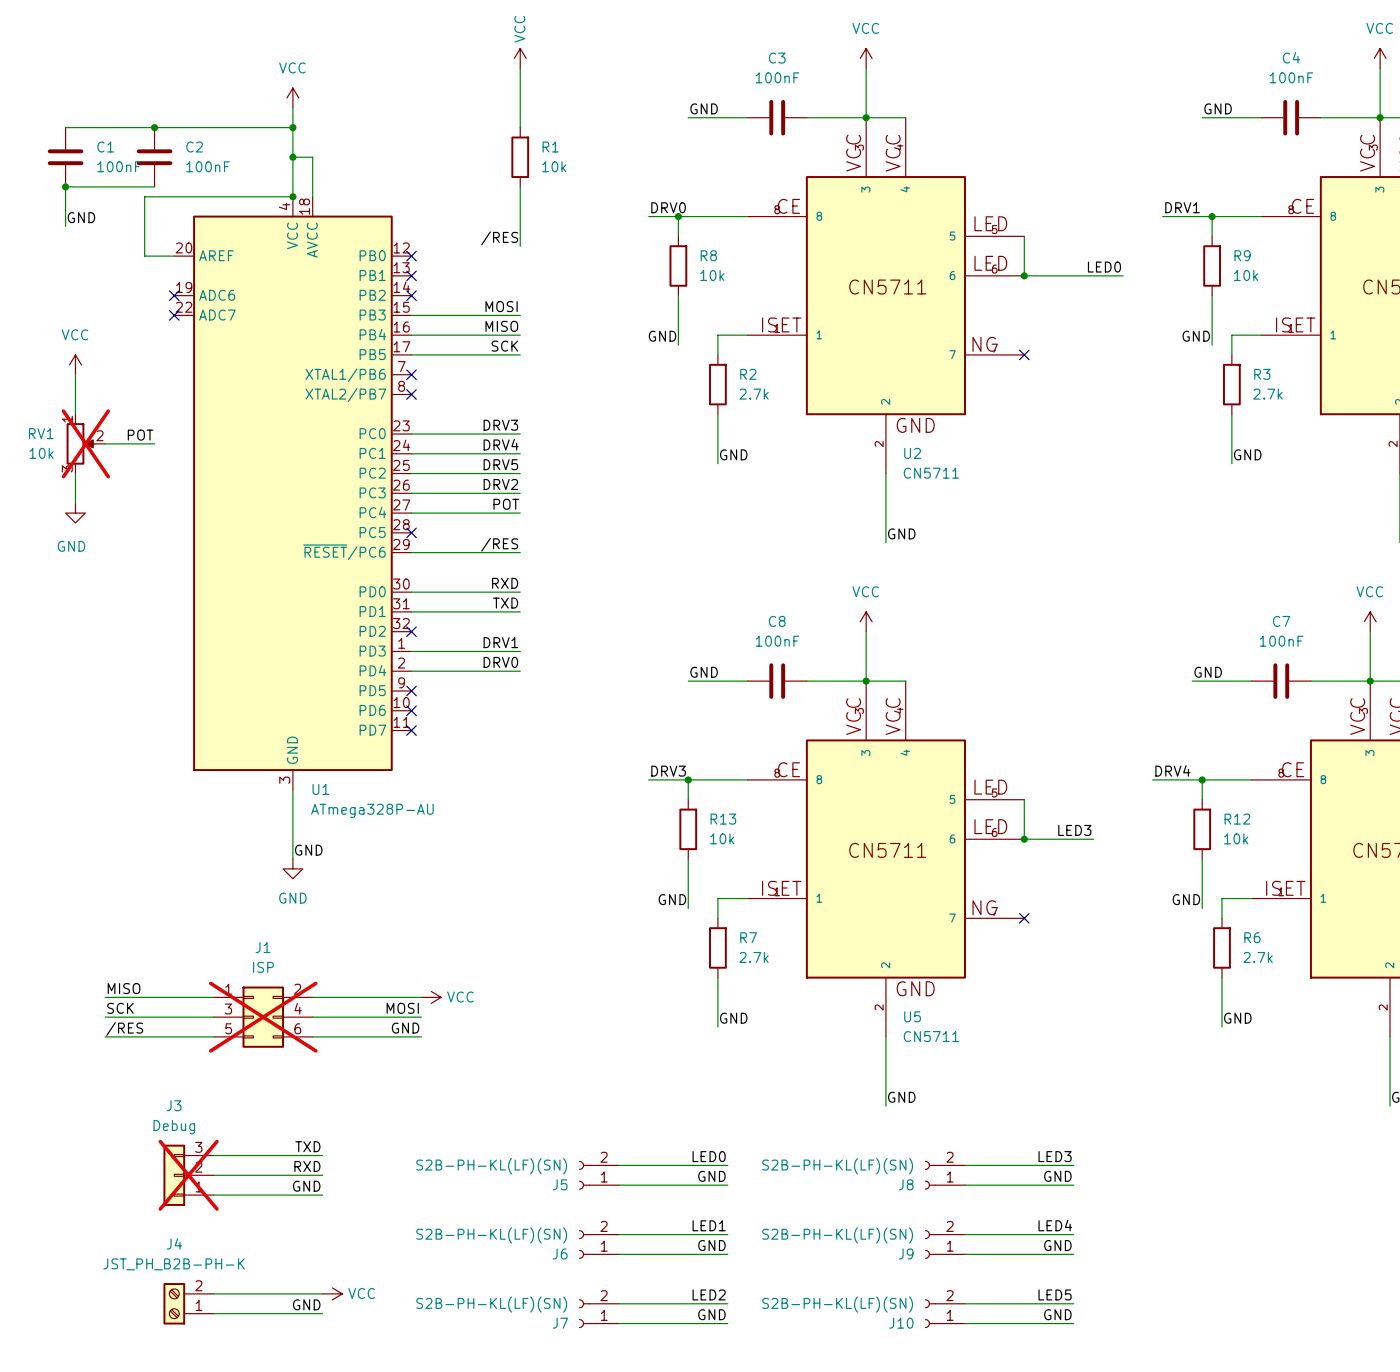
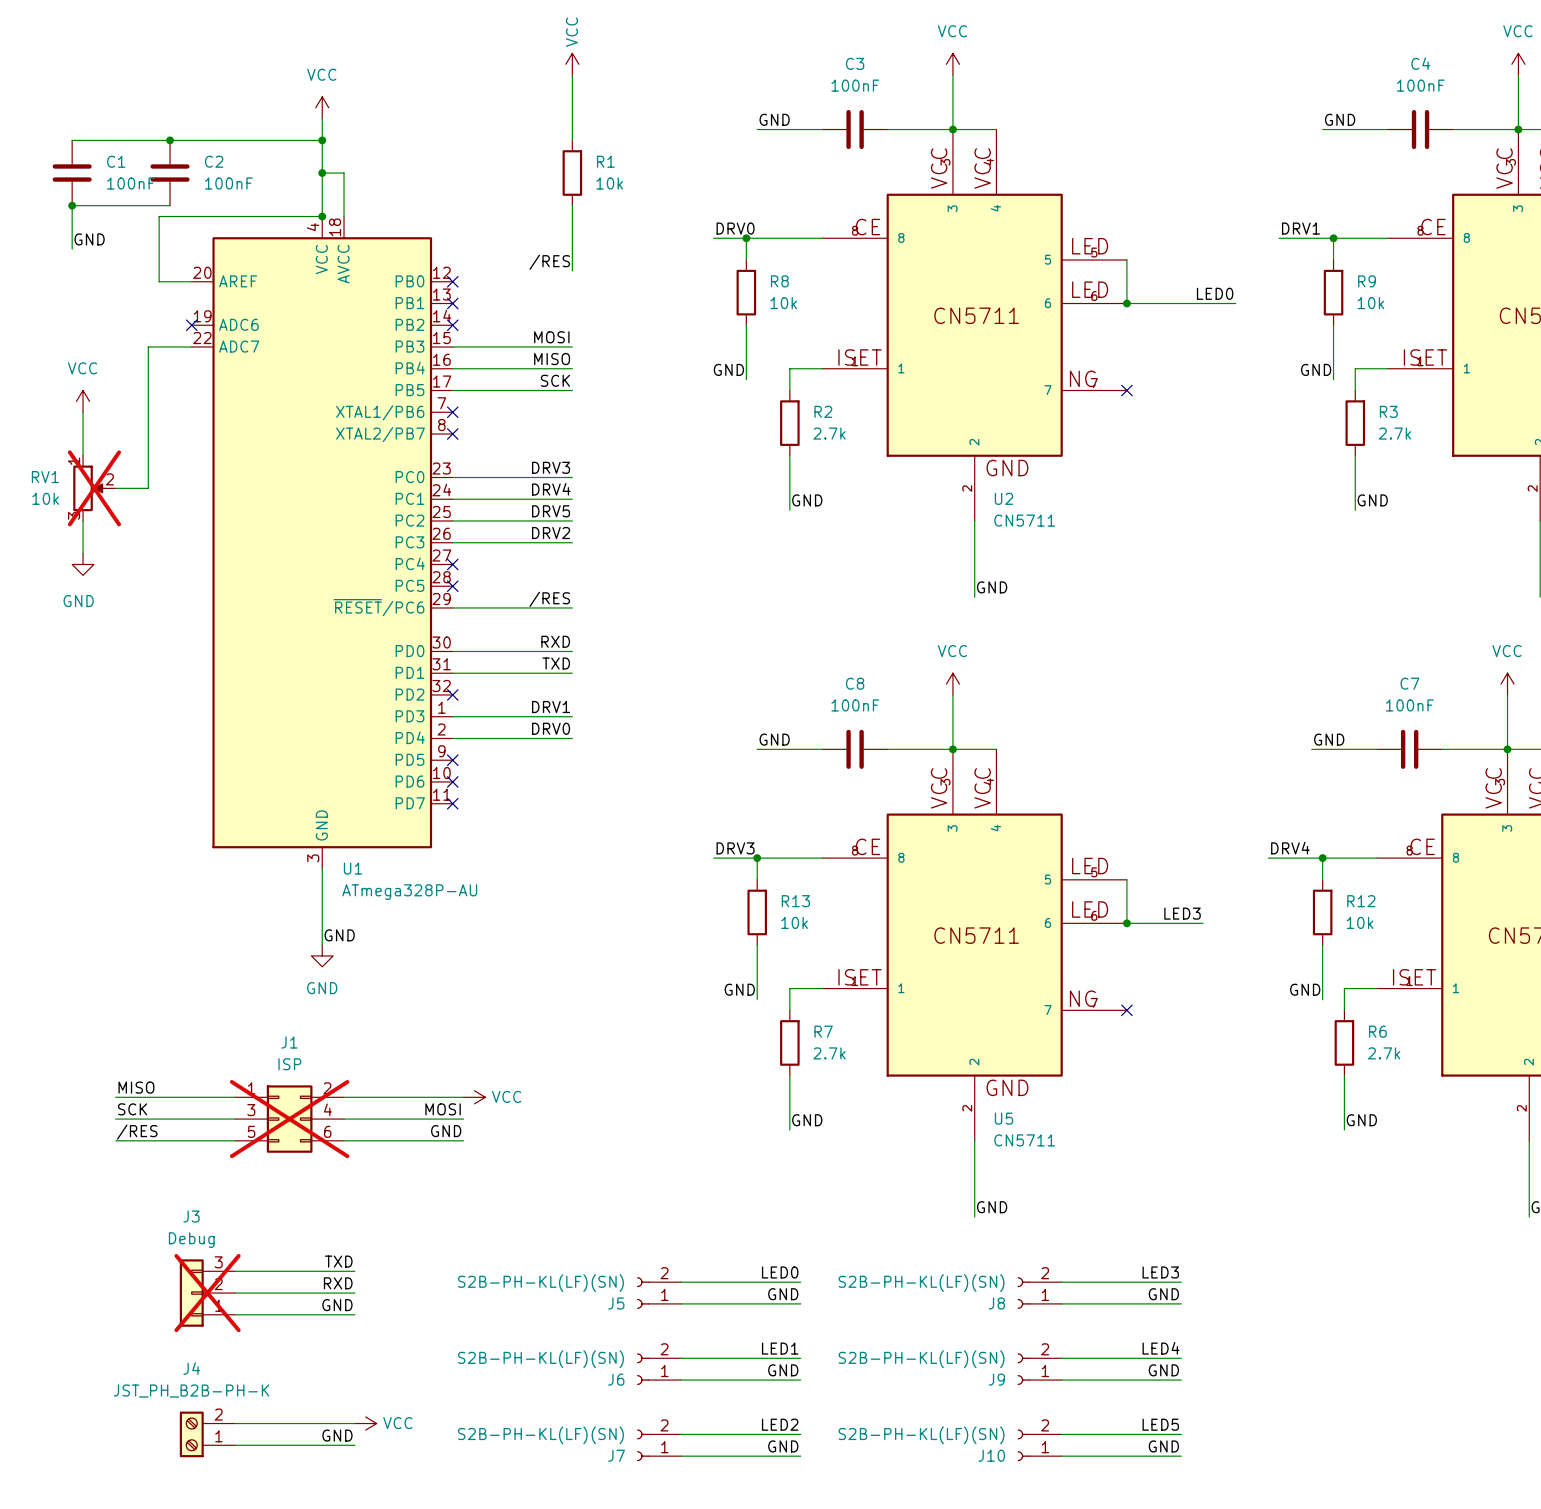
no-connect mark: (174, 315) -> none
label: POT (140, 435) -> none
wire: (134, 443) (154, 443) -> (148, 488) (148, 347) (191, 347)
label: POT (506, 504) -> none
wire: (411, 513) (520, 513) -> none
no-connect mark: none -> (452, 564)

